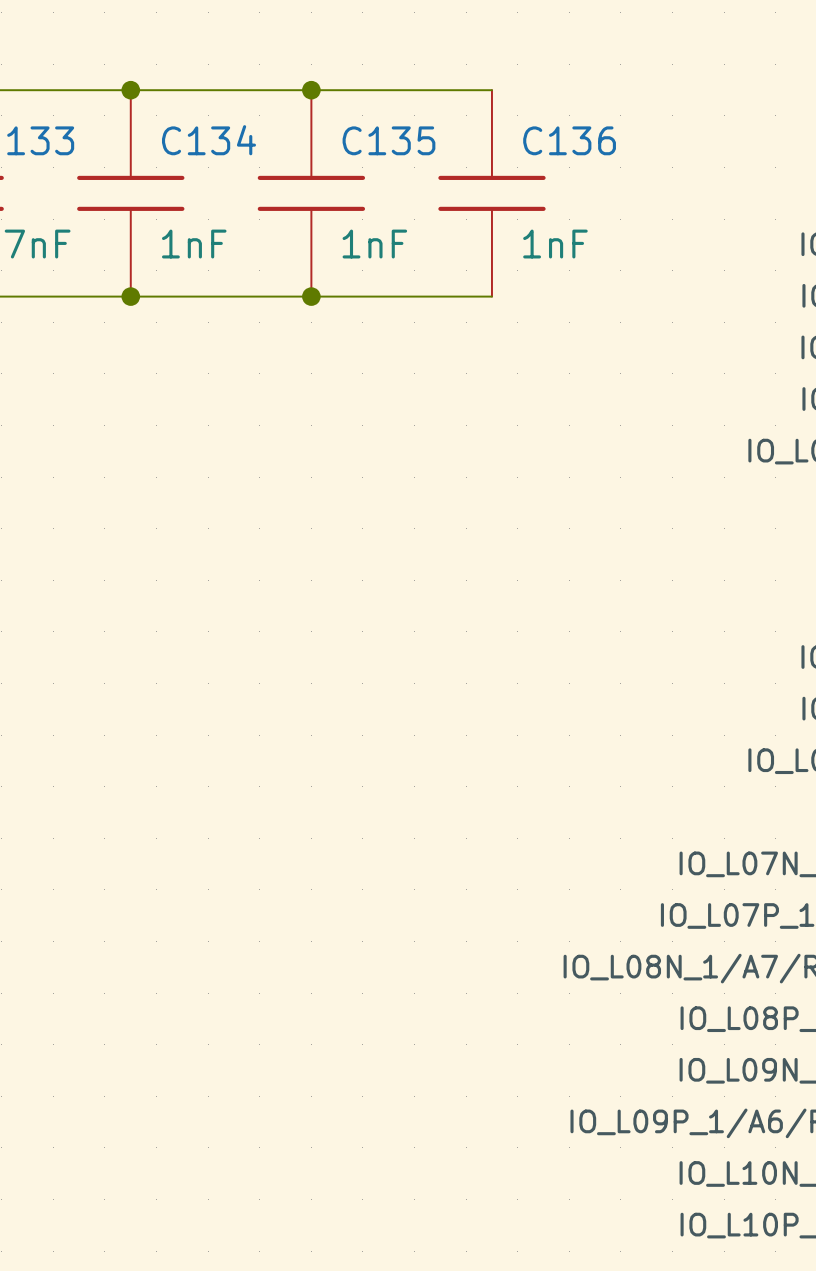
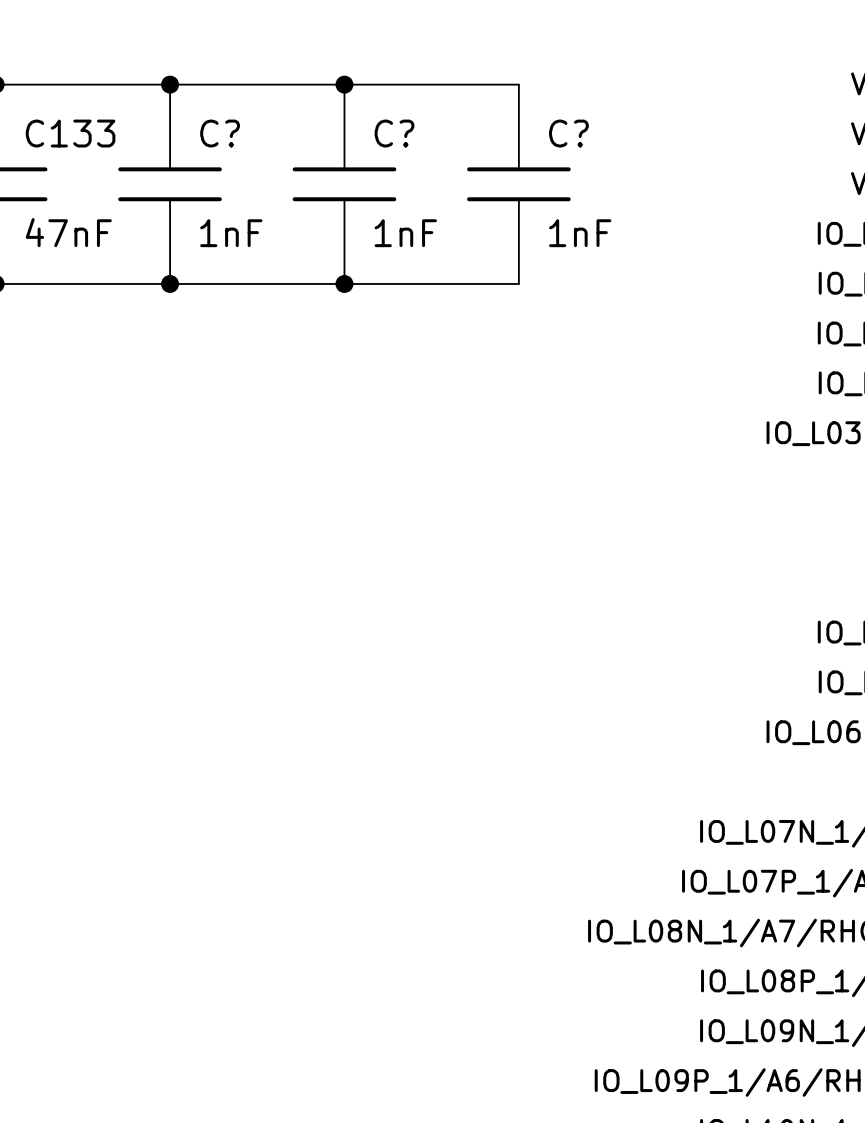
C134 name: C134 (208, 140) -> C? (220, 133)
C135 name: C135 (388, 140) -> C? (394, 133)
C136 name: C136 (569, 140) -> C? (568, 133)

